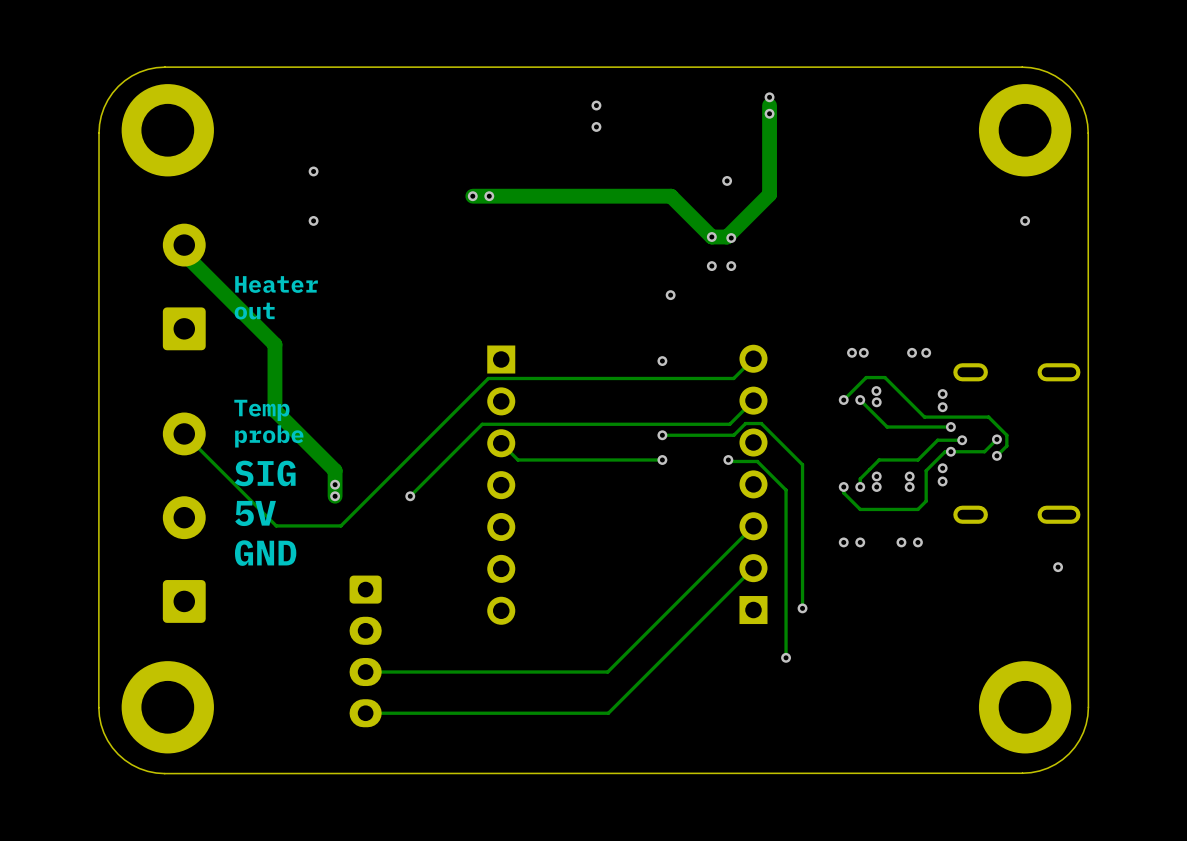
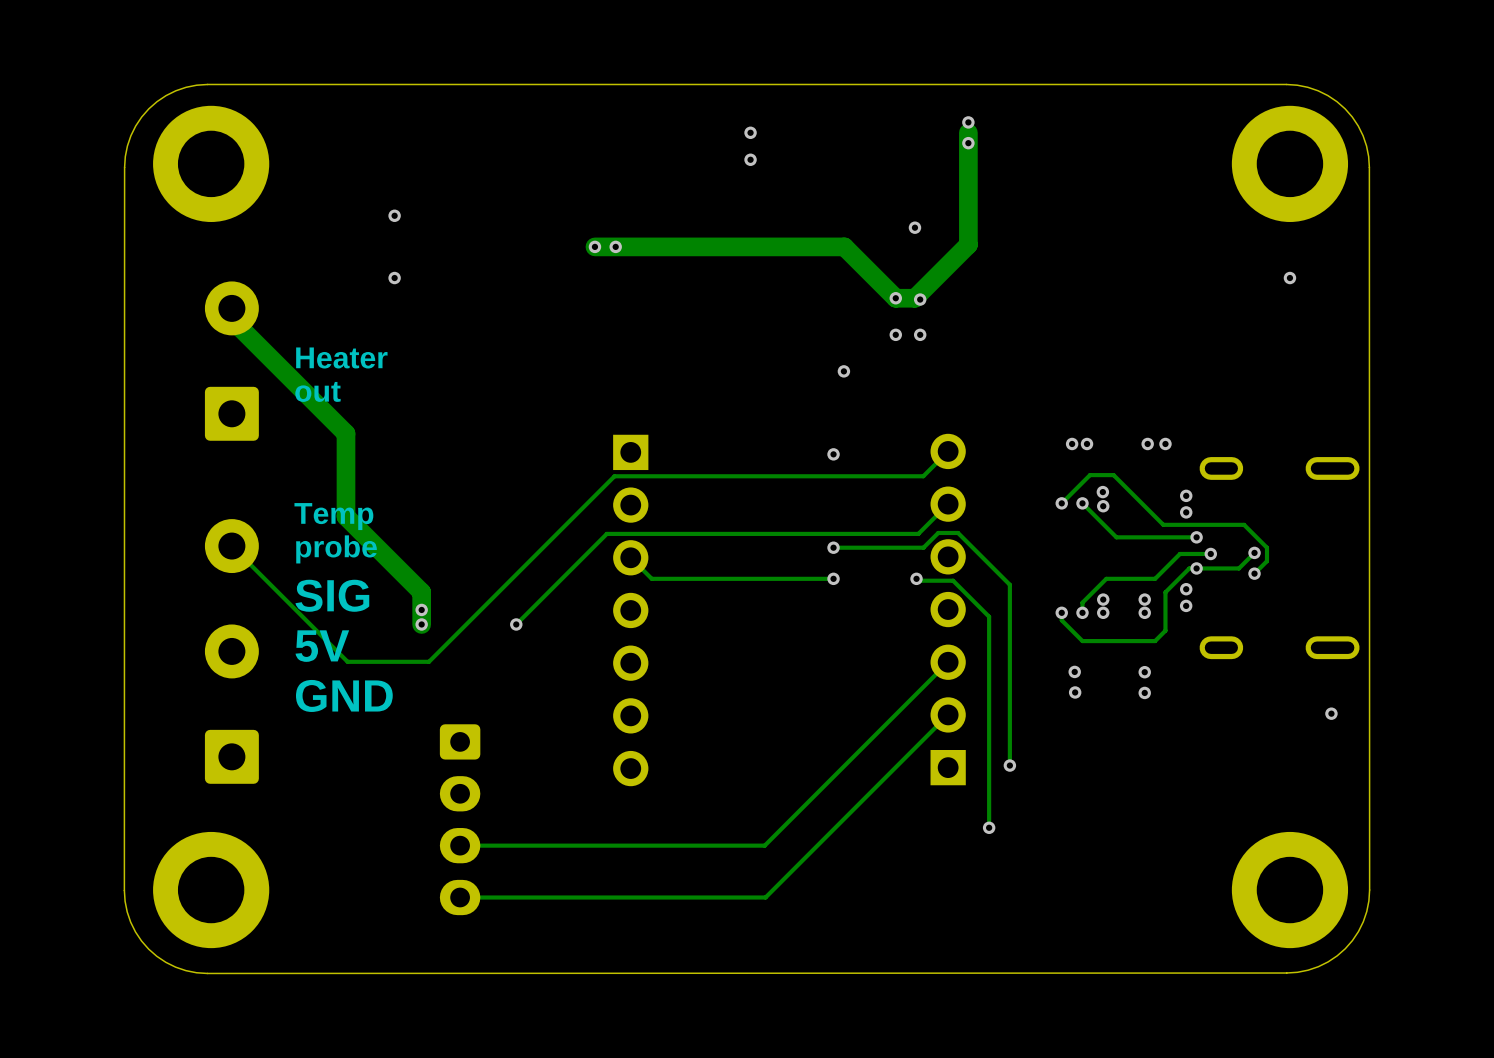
via: none -> (1074, 671)
via: none -> (1144, 672)
via: (843, 542) -> none
via: (860, 542) -> none
via: (901, 542) -> none
via: (917, 542) -> none
via: none -> (1075, 692)
via: none -> (1144, 692)

